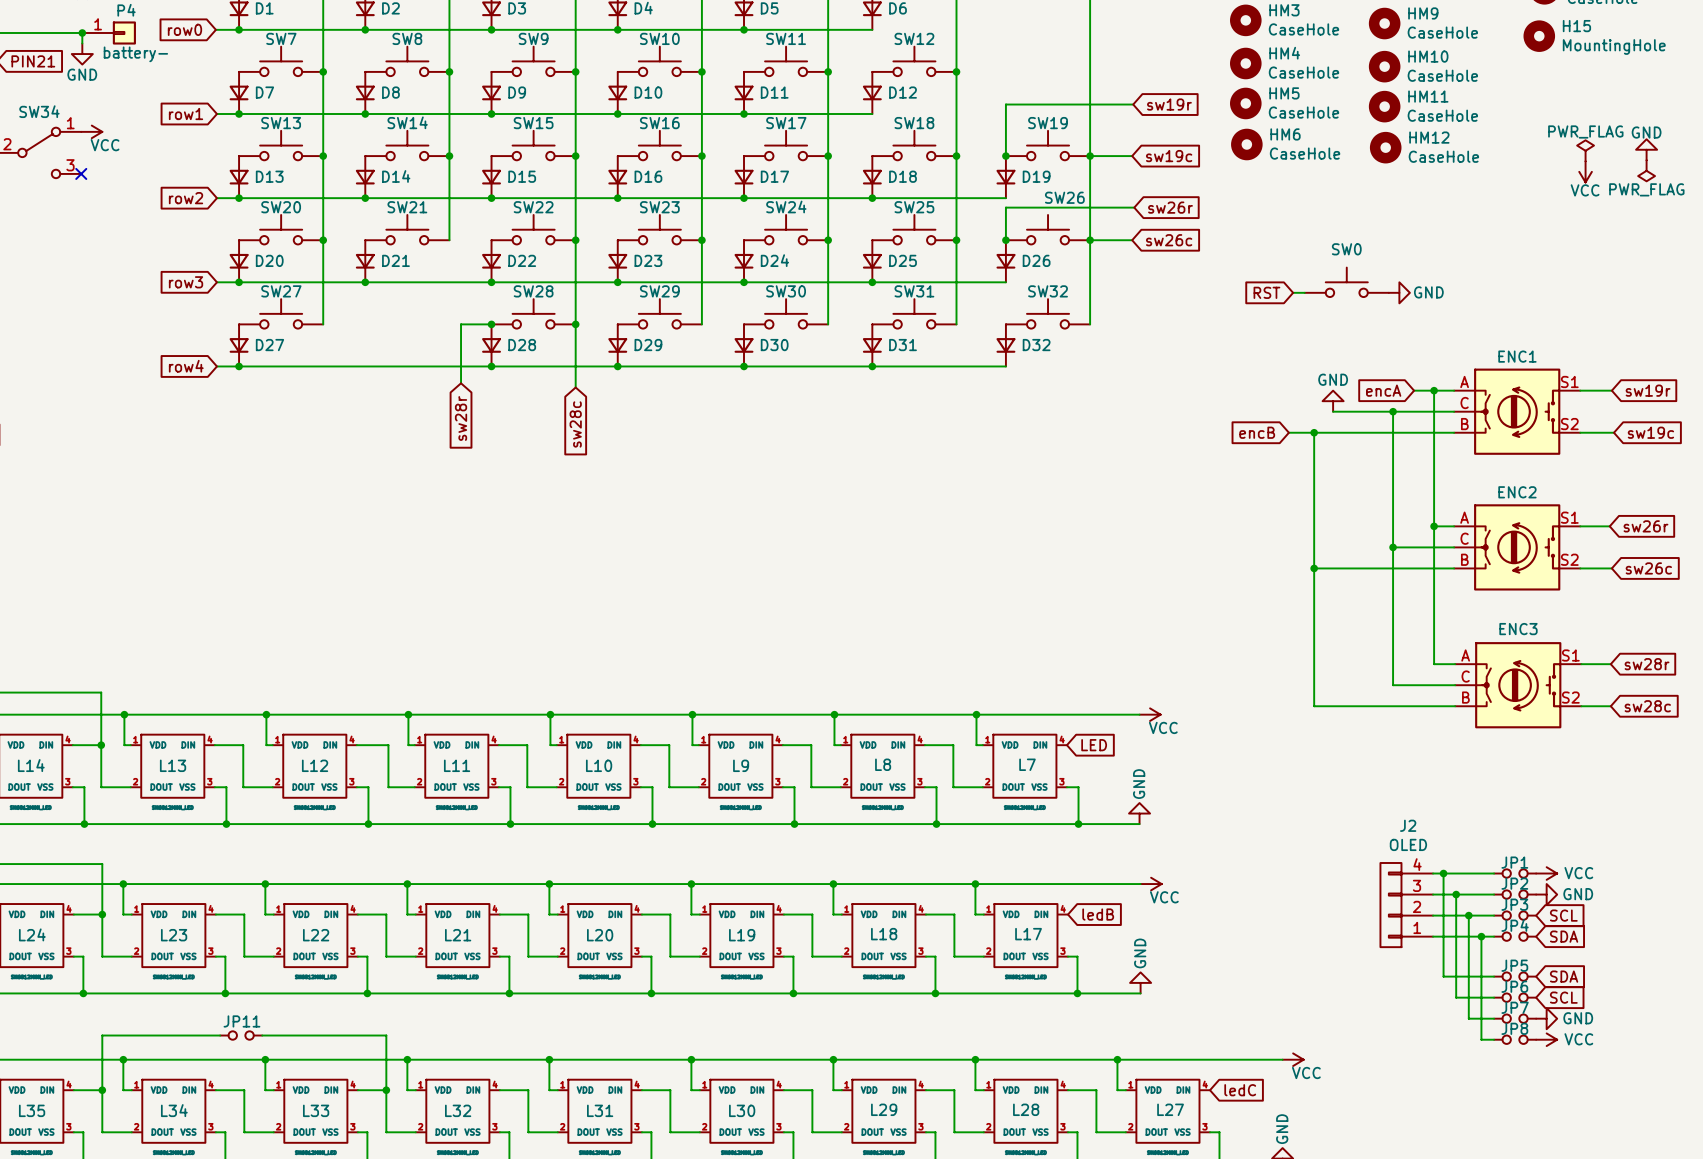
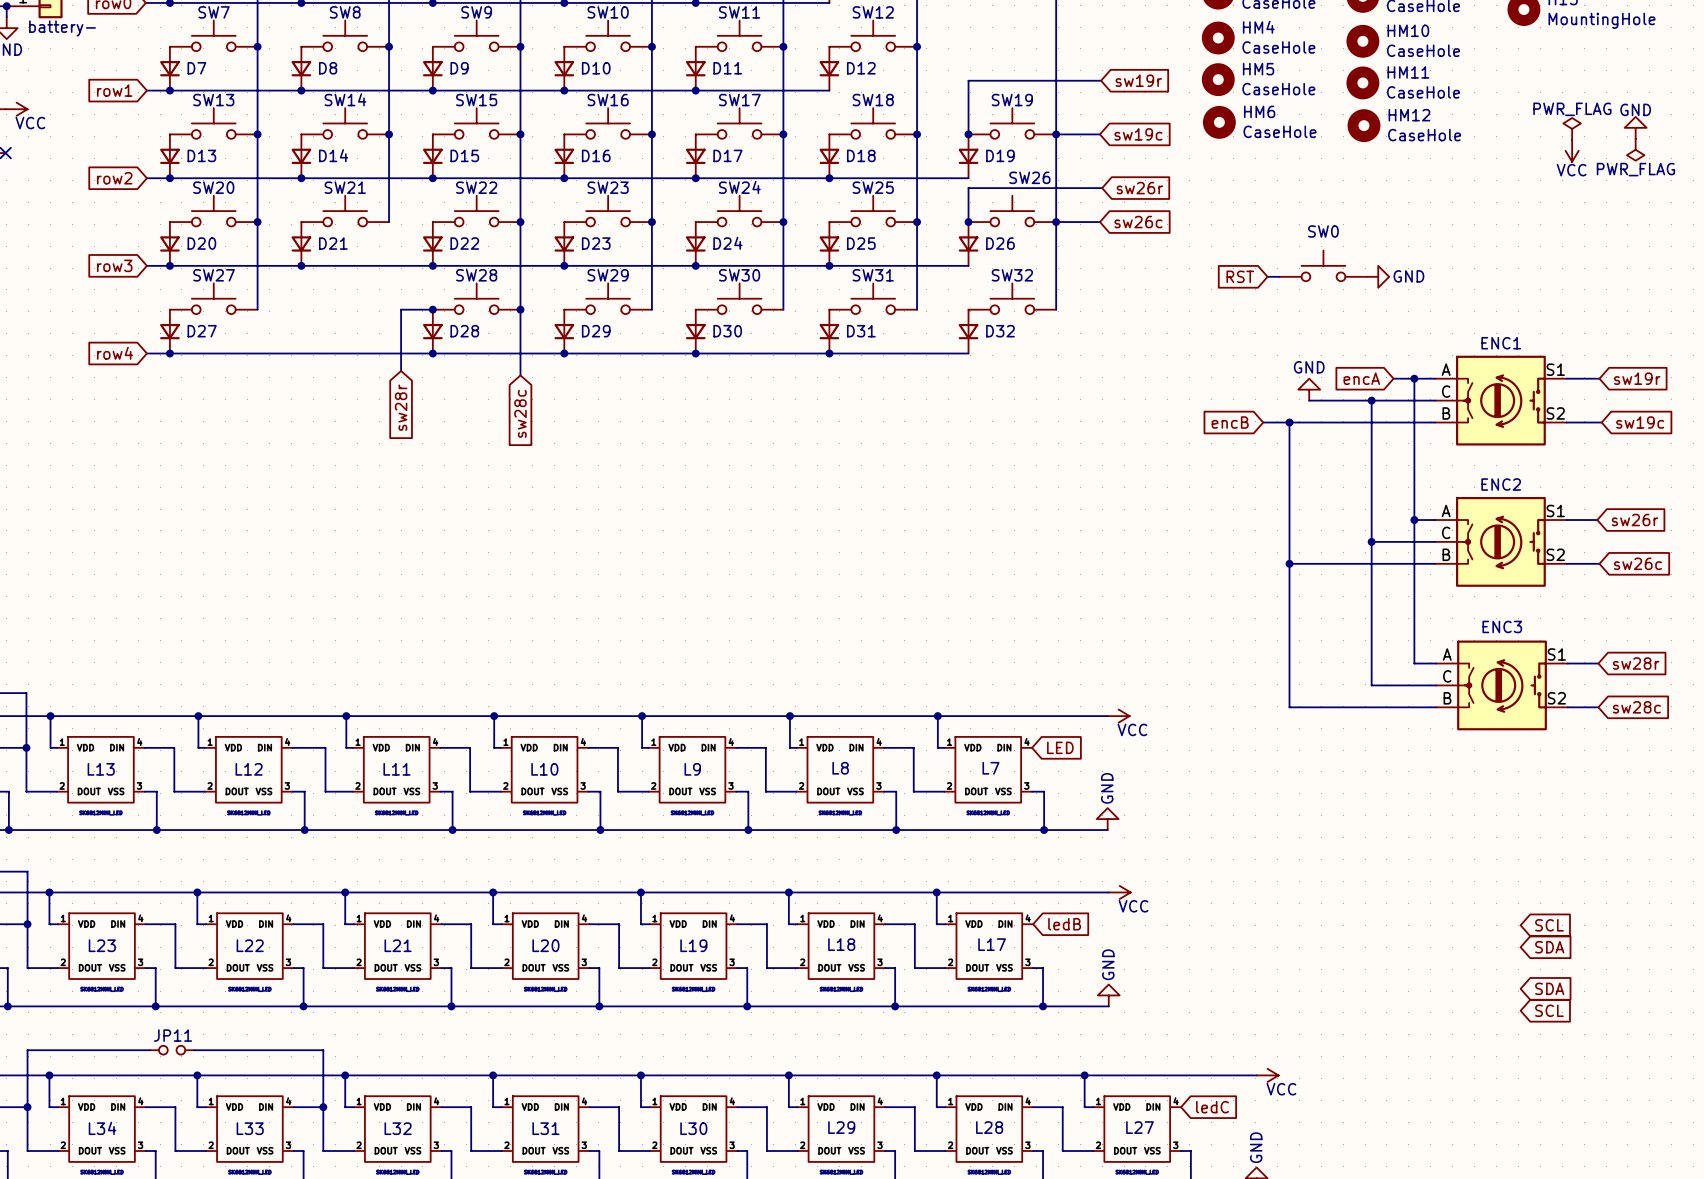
wire: (1433, 873) (1494, 873) -> none
wire: (1443, 873) (1443, 976) (1494, 976) -> none
junction: (1443, 873) -> none
JP1: (1515, 873) -> none
power symbol: VCC (1546, 873) -> none
wire: (1433, 894) (1494, 894) -> none
wire: (1456, 894) (1456, 997) (1494, 997) -> none
junction: (1456, 894) -> none
JP2: (1515, 894) -> none
power symbol: GND (1546, 894) -> none
J2: OLED (1406, 905) -> none
wire: (1433, 915) (1494, 915) -> none
wire: (1468, 915) (1468, 1018) (1494, 1018) -> none
junction: (1468, 915) -> none
JP3: (1515, 915) -> none
wire: (1433, 936) (1494, 936) -> none
wire: (1481, 936) (1481, 1039) (1494, 1039) -> none
junction: (1481, 936) -> none
JP4: (1515, 936) -> none
JP5: (1515, 976) -> none
JP6: (1515, 997) -> none
JP7: (1515, 1018) -> none
power symbol: GND (1546, 1018) -> none
JP8: (1515, 1039) -> none
power symbol: VCC (1546, 1039) -> none

